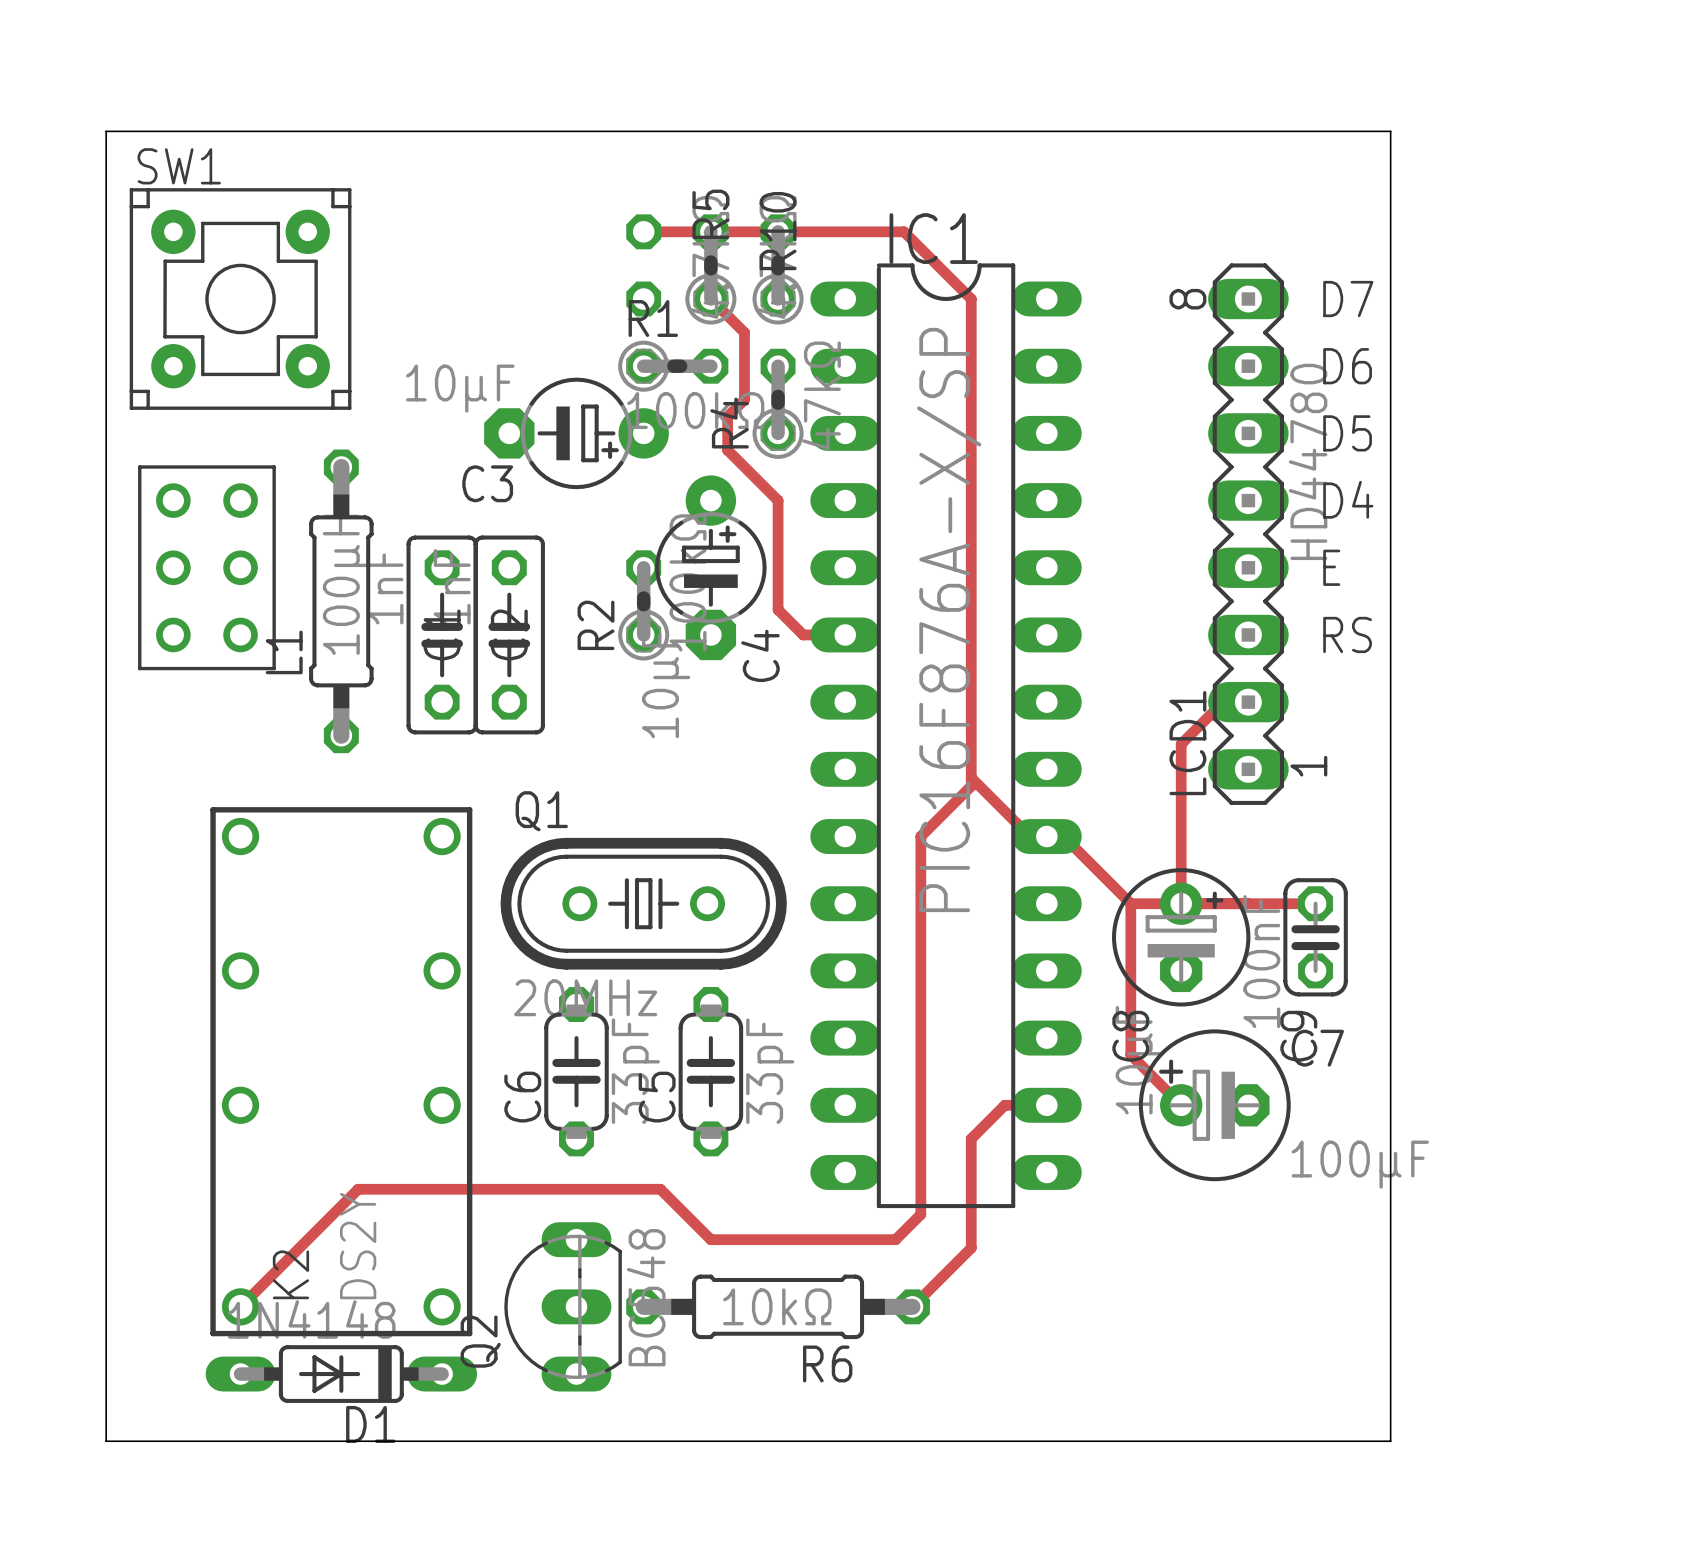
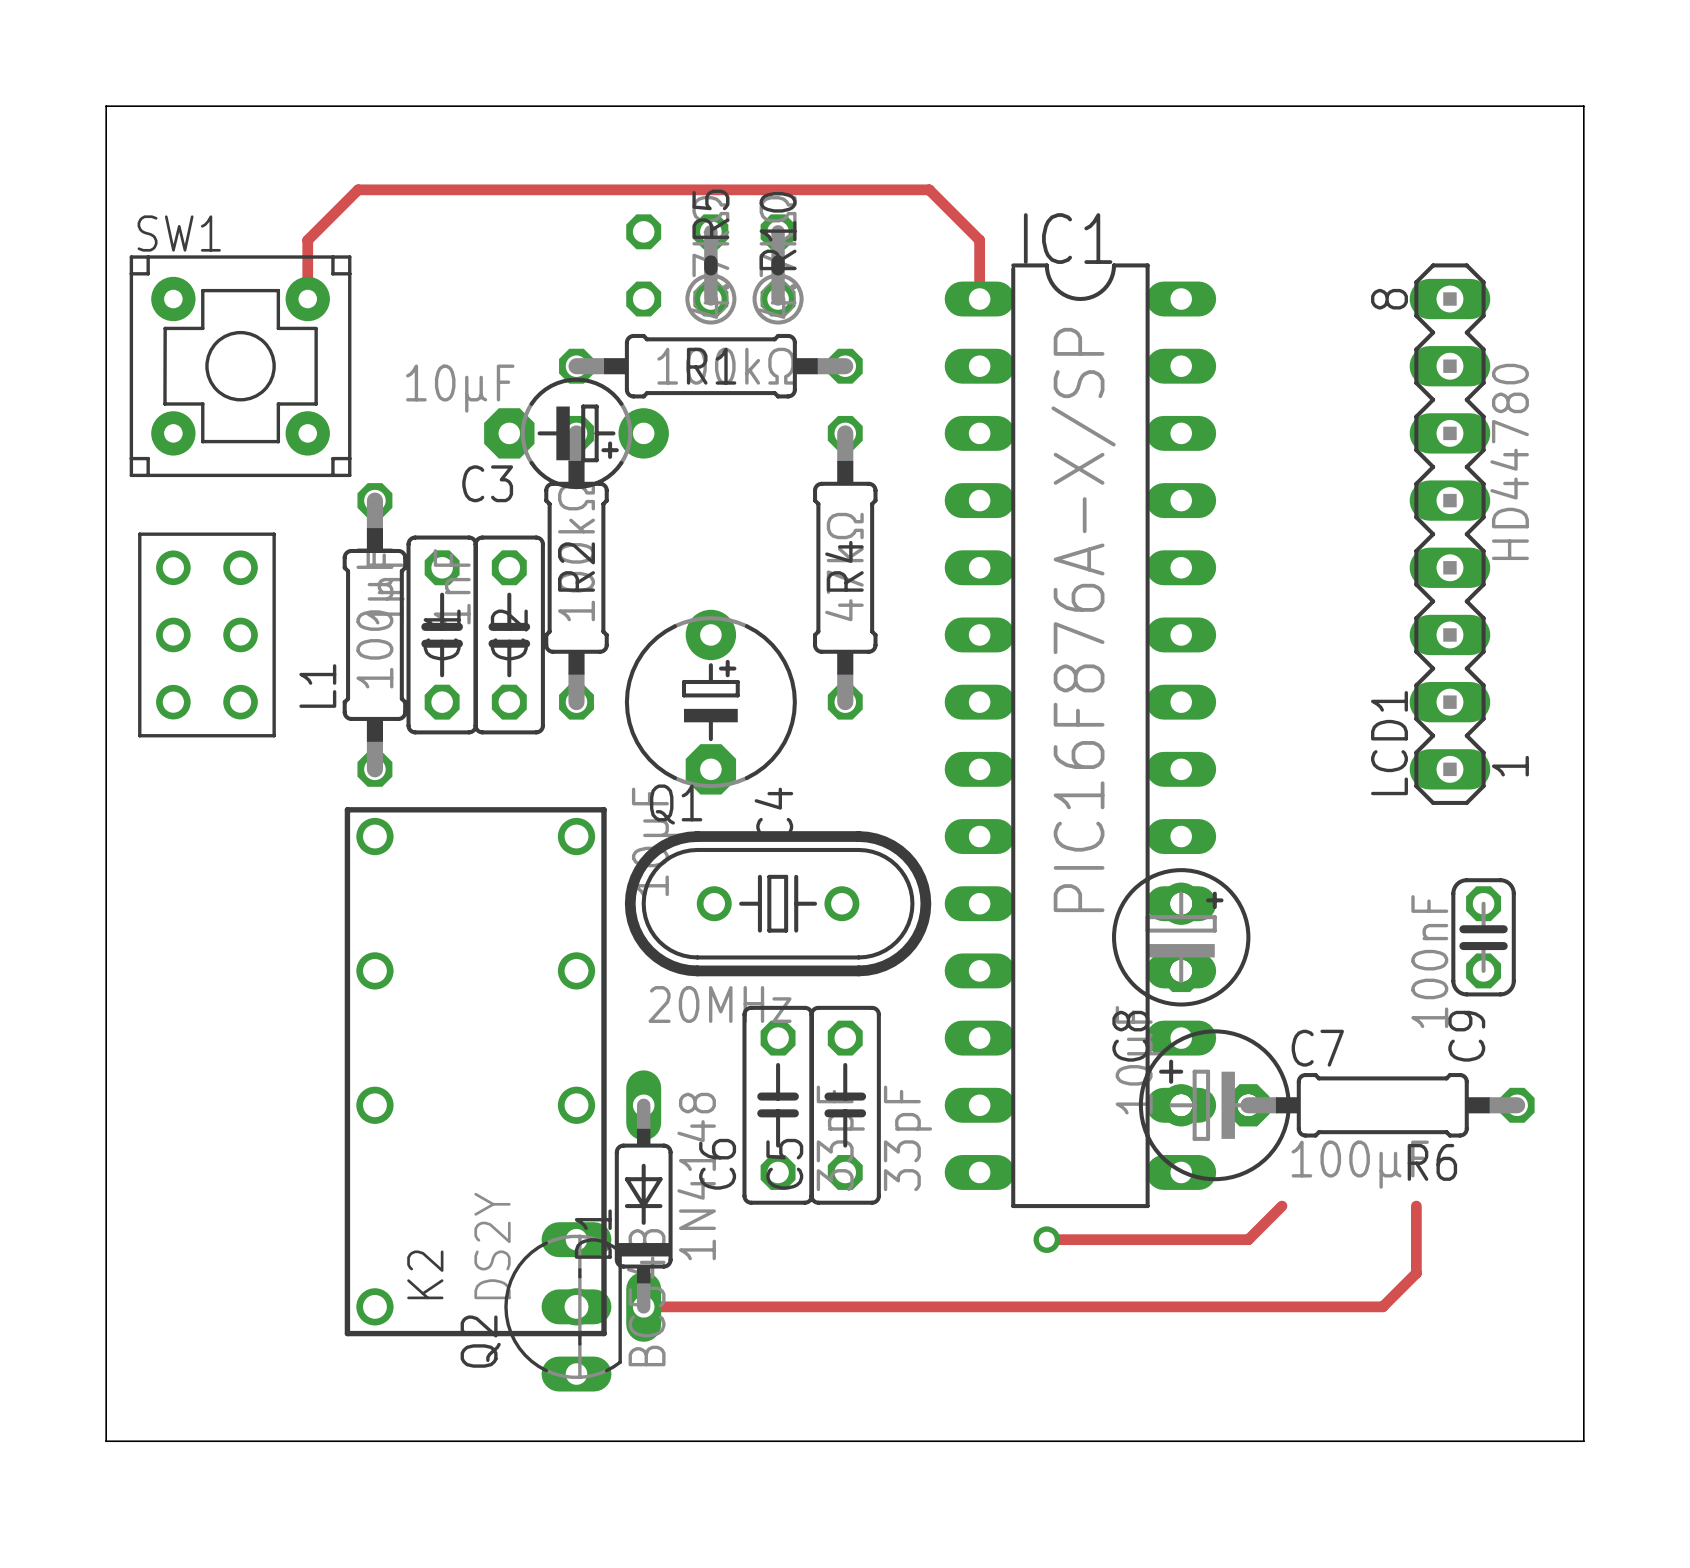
board edge: (106, 131) (1390, 131) (1390, 1441) -> (106, 131) (106, 106) (1583, 106) (1583, 1441) (1390, 1441)
track: (643, 231) (904, 231) (971, 299) (971, 786) (920, 836) (920, 1214) (895, 1239) (710, 1239) (660, 1189) (358, 1189) (240, 1306) -> none
SW1 position: (240, 299) -> (240, 366)
track: none -> (307, 299) (307, 240) (358, 189) (929, 189) (979, 240) (979, 299)
track: (710, 299) (744, 332) (744, 399) (727, 416) (727, 450) (778, 500) (778, 609) (803, 634) (845, 634) -> none
text: D7 (1348, 299) -> none
R1 footprint: [618, 340, 729, 392] -> [559, 333, 863, 399]
R4 footprint: [752, 348, 804, 459] -> [813, 415, 878, 720]
text: D6 (1347, 366) -> none
text: D5 (1347, 433) -> none
C4 footprint: [655, 475, 767, 661] -> [624, 609, 797, 795]
text: D4 (1348, 499) -> none
LCD1 position: (1248, 534) -> (1449, 534)
R2 footprint: [618, 550, 670, 661] -> [544, 415, 609, 720]
part position: (206, 567) -> (206, 634)
text: E (1331, 567) -> none
L1 position: (341, 601) -> (374, 634)
text: RS (1347, 634) -> none
track: (1248, 702) (1223, 702) (1181, 744) (1181, 903) -> none
IC1 position: (946, 735) -> (1080, 735)
track: (971, 777) (1030, 836) (1063, 836) (1130, 903) -> none
Q1 footprint: [500, 837, 787, 970] -> [624, 831, 932, 977]
track: (1130, 903) (1315, 903) -> none
track: (1130, 903) (1130, 1054) (1181, 1105) -> none
C9 position: (1315, 937) -> (1483, 937)
C6 footprint: [544, 987, 609, 1157] -> [742, 1005, 814, 1205]
C5 footprint: [678, 987, 744, 1157] -> [809, 1005, 881, 1205]
K2 position: (341, 1071) -> (475, 1071)
track: (1046, 1105) (1004, 1105) (971, 1138) (971, 1248) (912, 1306) -> none
track: none -> (1281, 1206) (1248, 1239) (1046, 1239)
track: none -> (1416, 1206) (1416, 1273) (1382, 1306) (643, 1306)
via: none -> (1046, 1239)
R6 value: 10kΩ (777, 1306) -> none
R6 position: (778, 1306) -> (1382, 1105)
D1 rotation: 0° (341, 1374) -> 90° clockwise (643, 1206)
D1 position: (341, 1374) -> (643, 1206)

